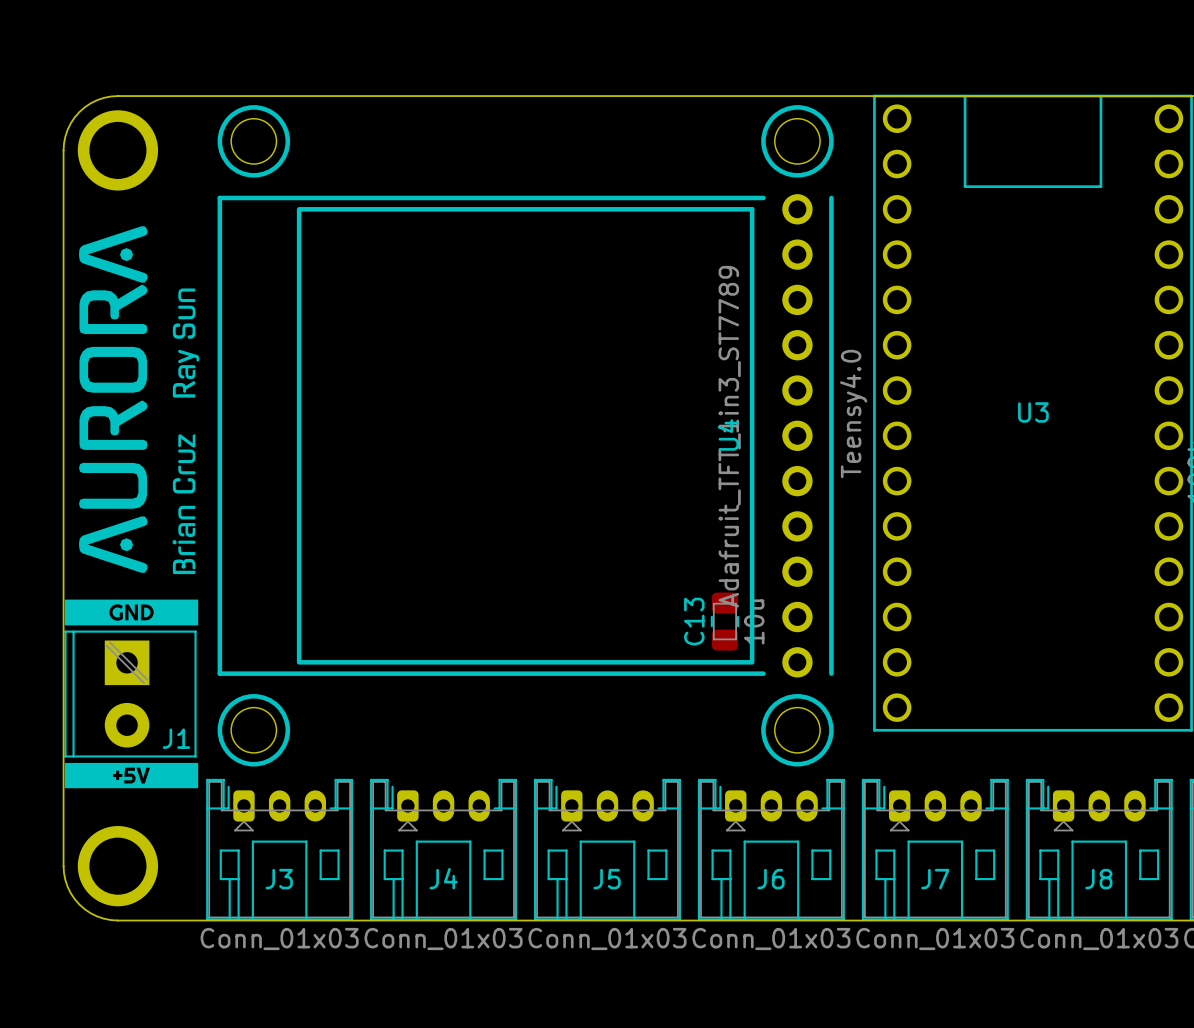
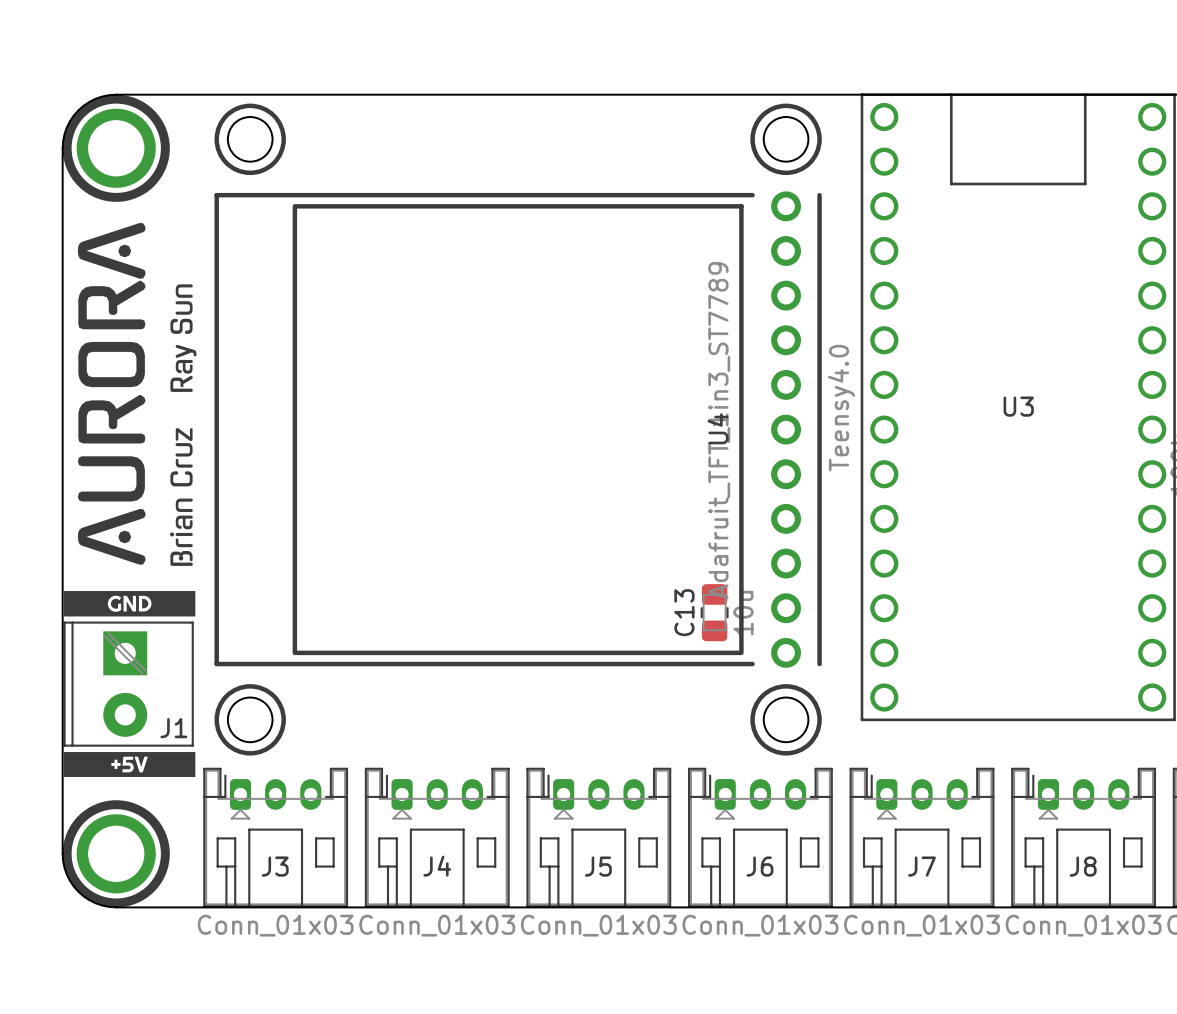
drawing: none -> [62, 94, 170, 202]
drawing: none -> [62, 800, 170, 908]

